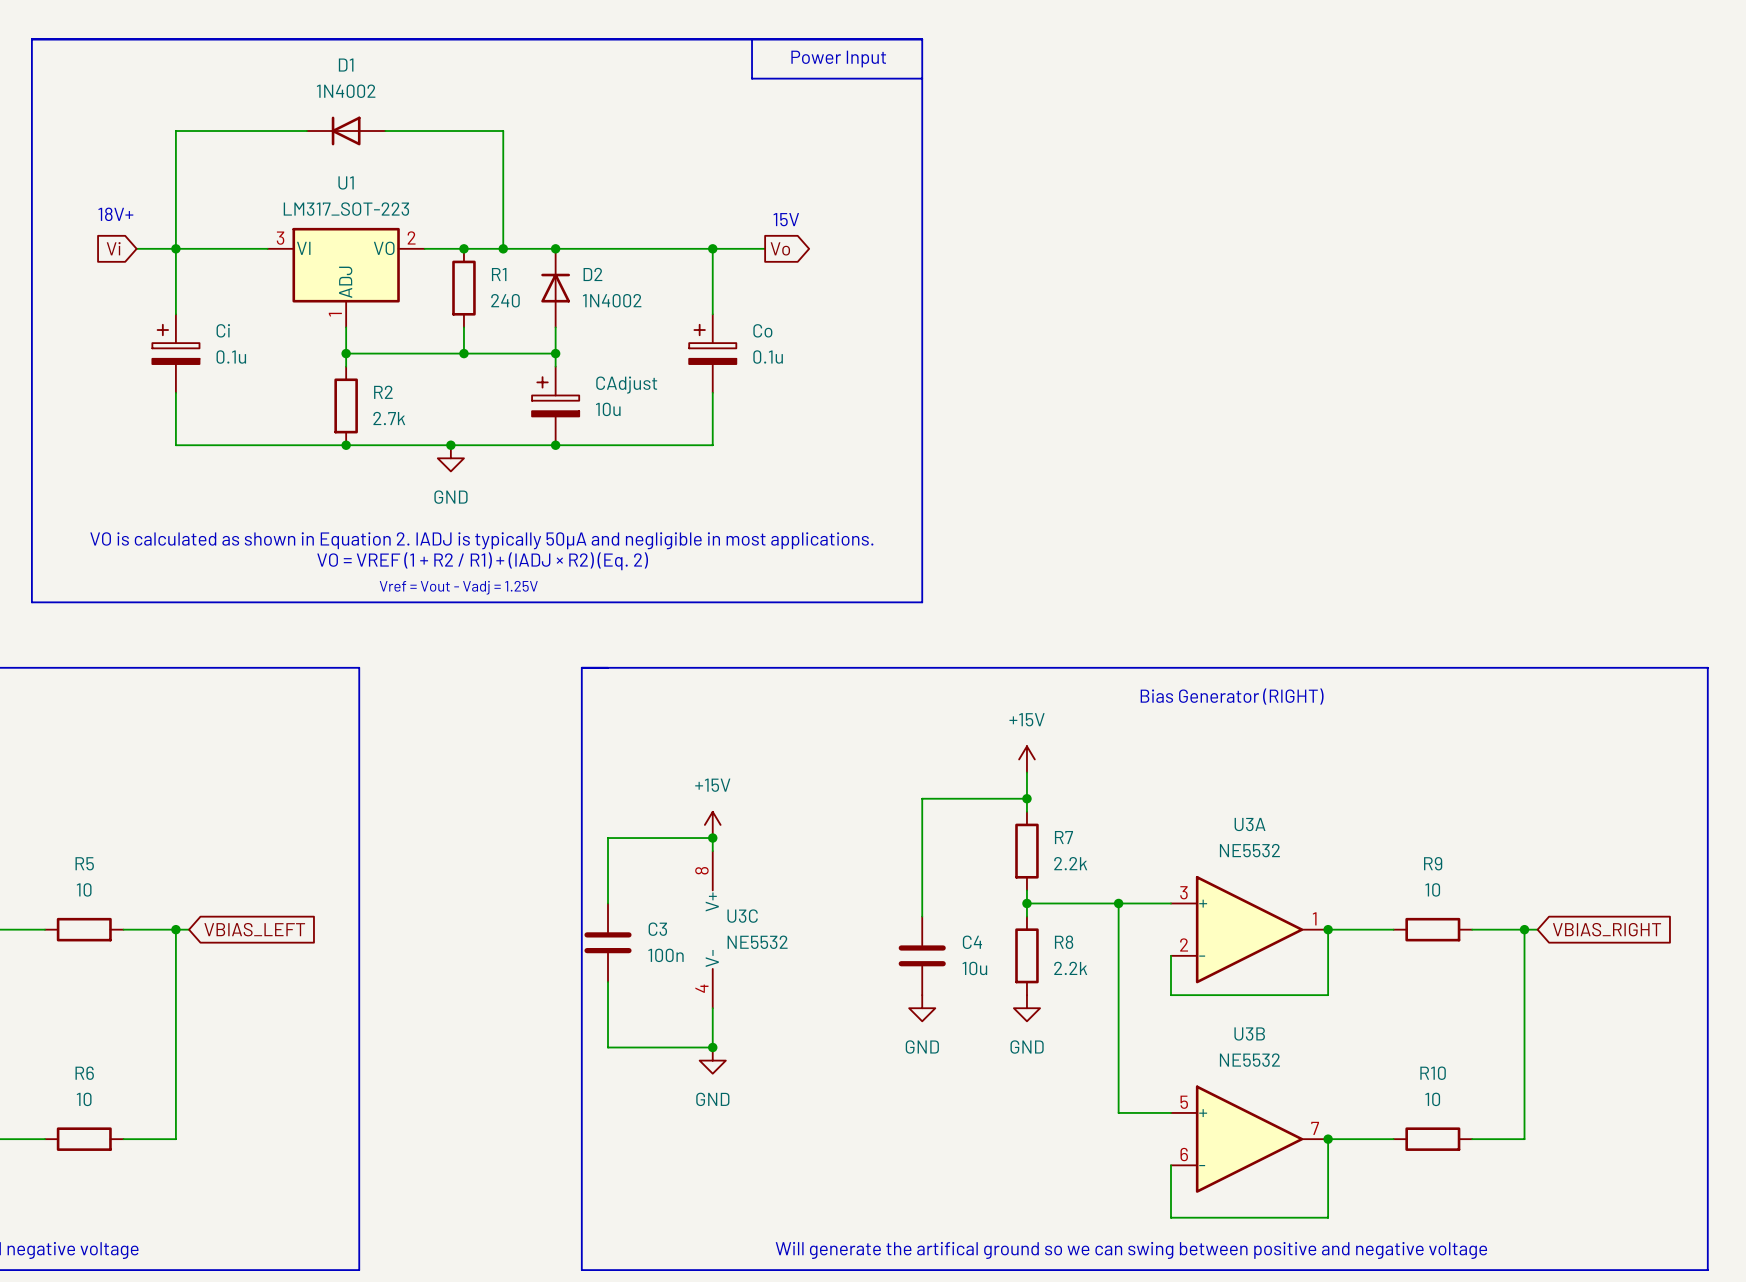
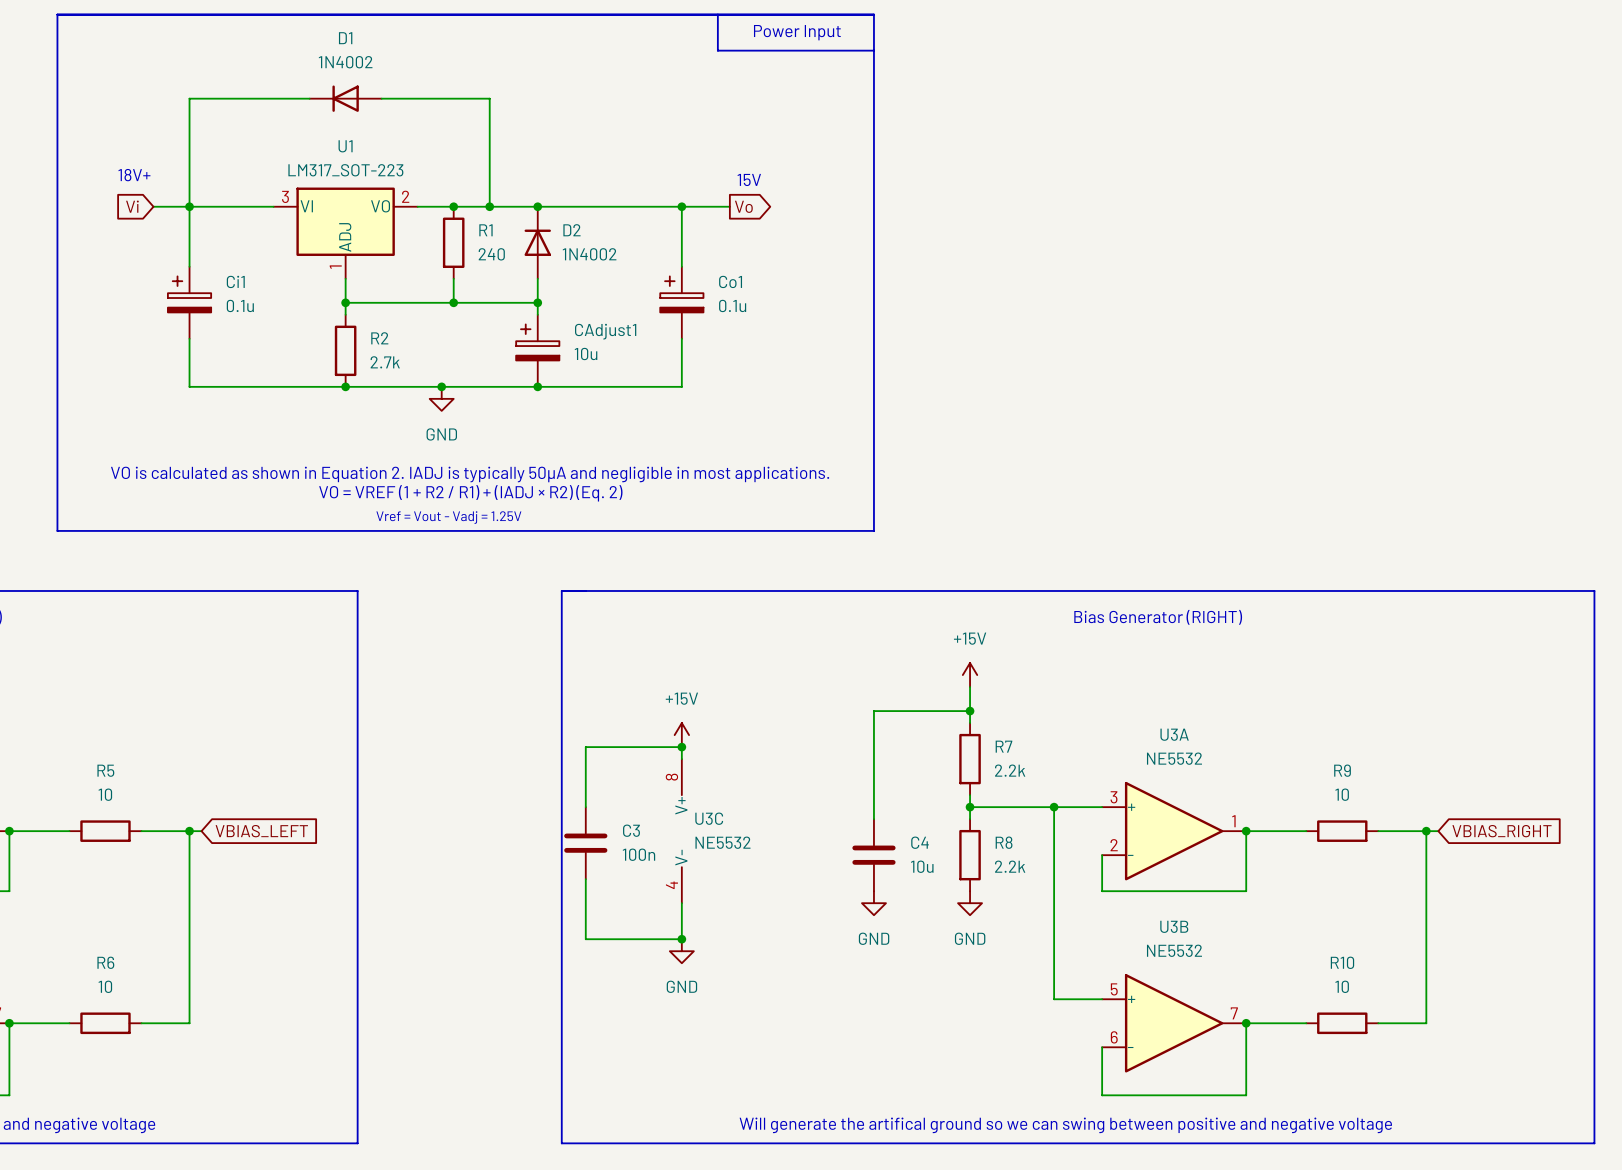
Ci name: Ci (223, 330) -> Ci1 (235, 281)
Co name: Co (762, 330) -> Co1 (730, 281)
CAdjust name: CAdjust (626, 385) -> CAdjust1 (605, 331)

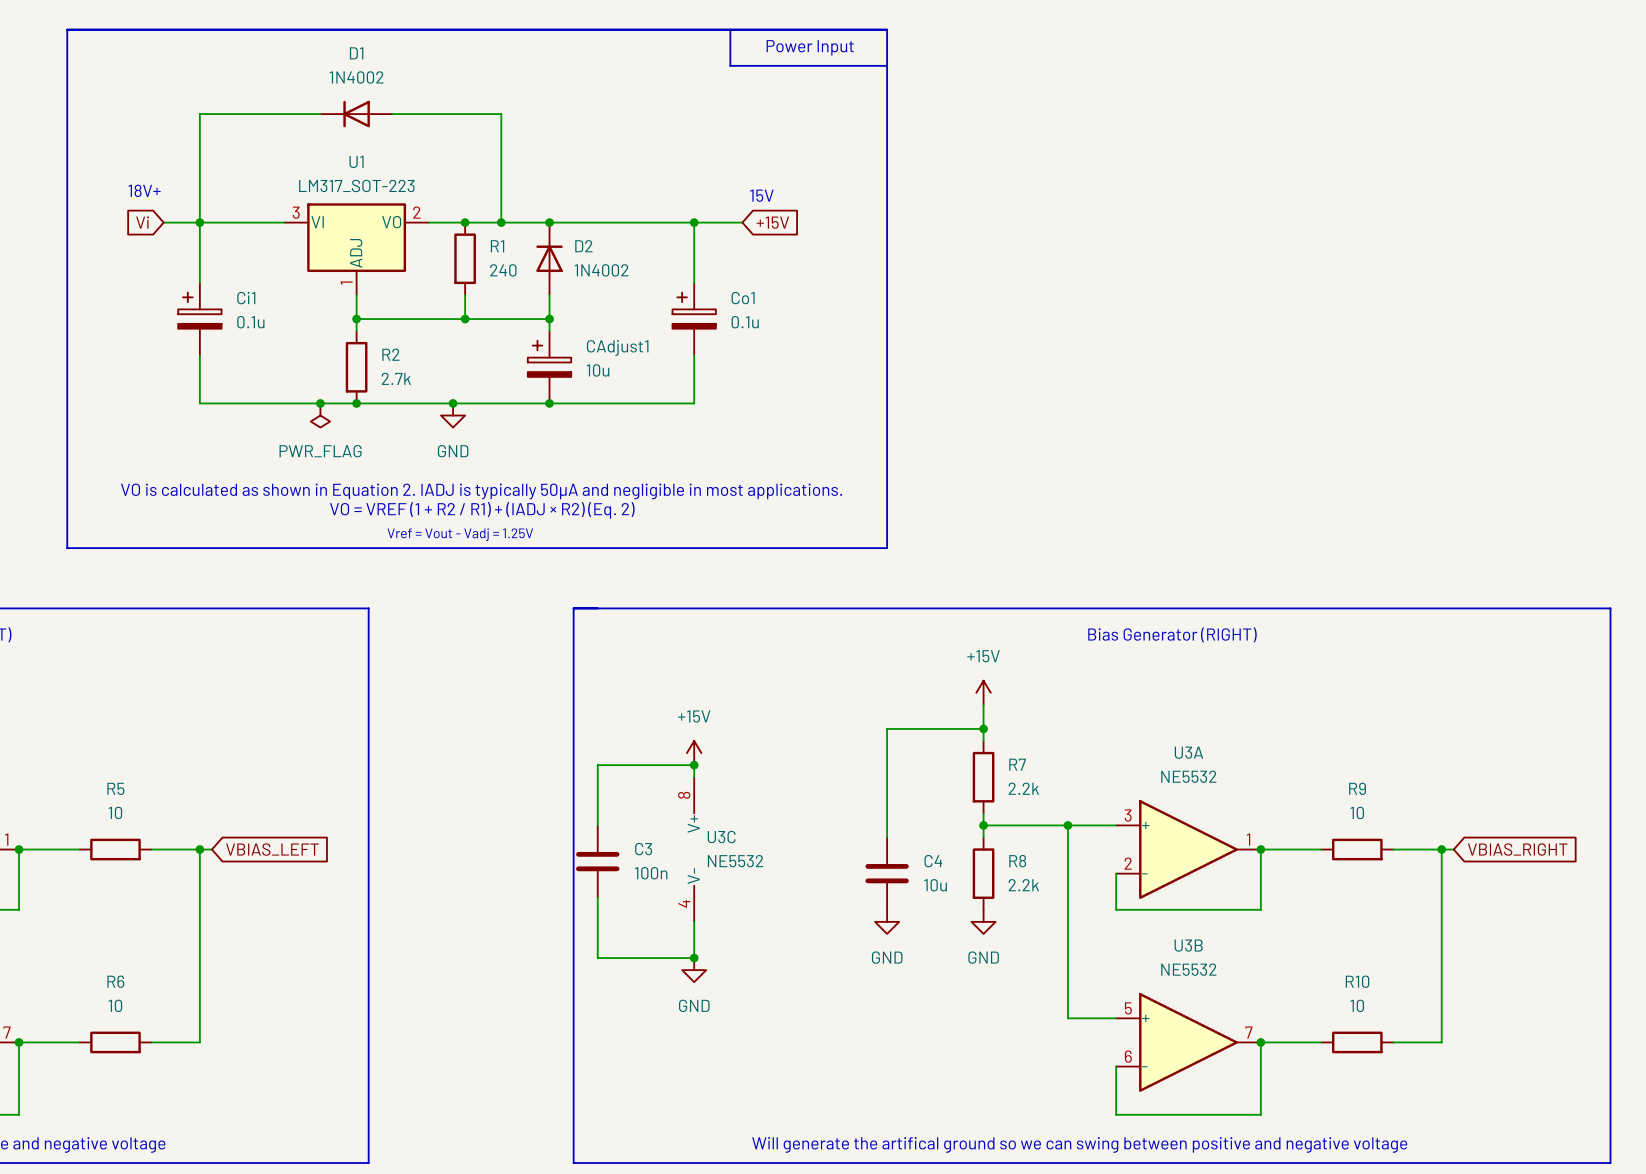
global label shape: output (743, 206) -> input (772, 222)
global label: Vo (743, 206) -> +15V (772, 222)
junction: none -> (320, 403)
power symbol: none -> PWR_FLAG (320, 415)

